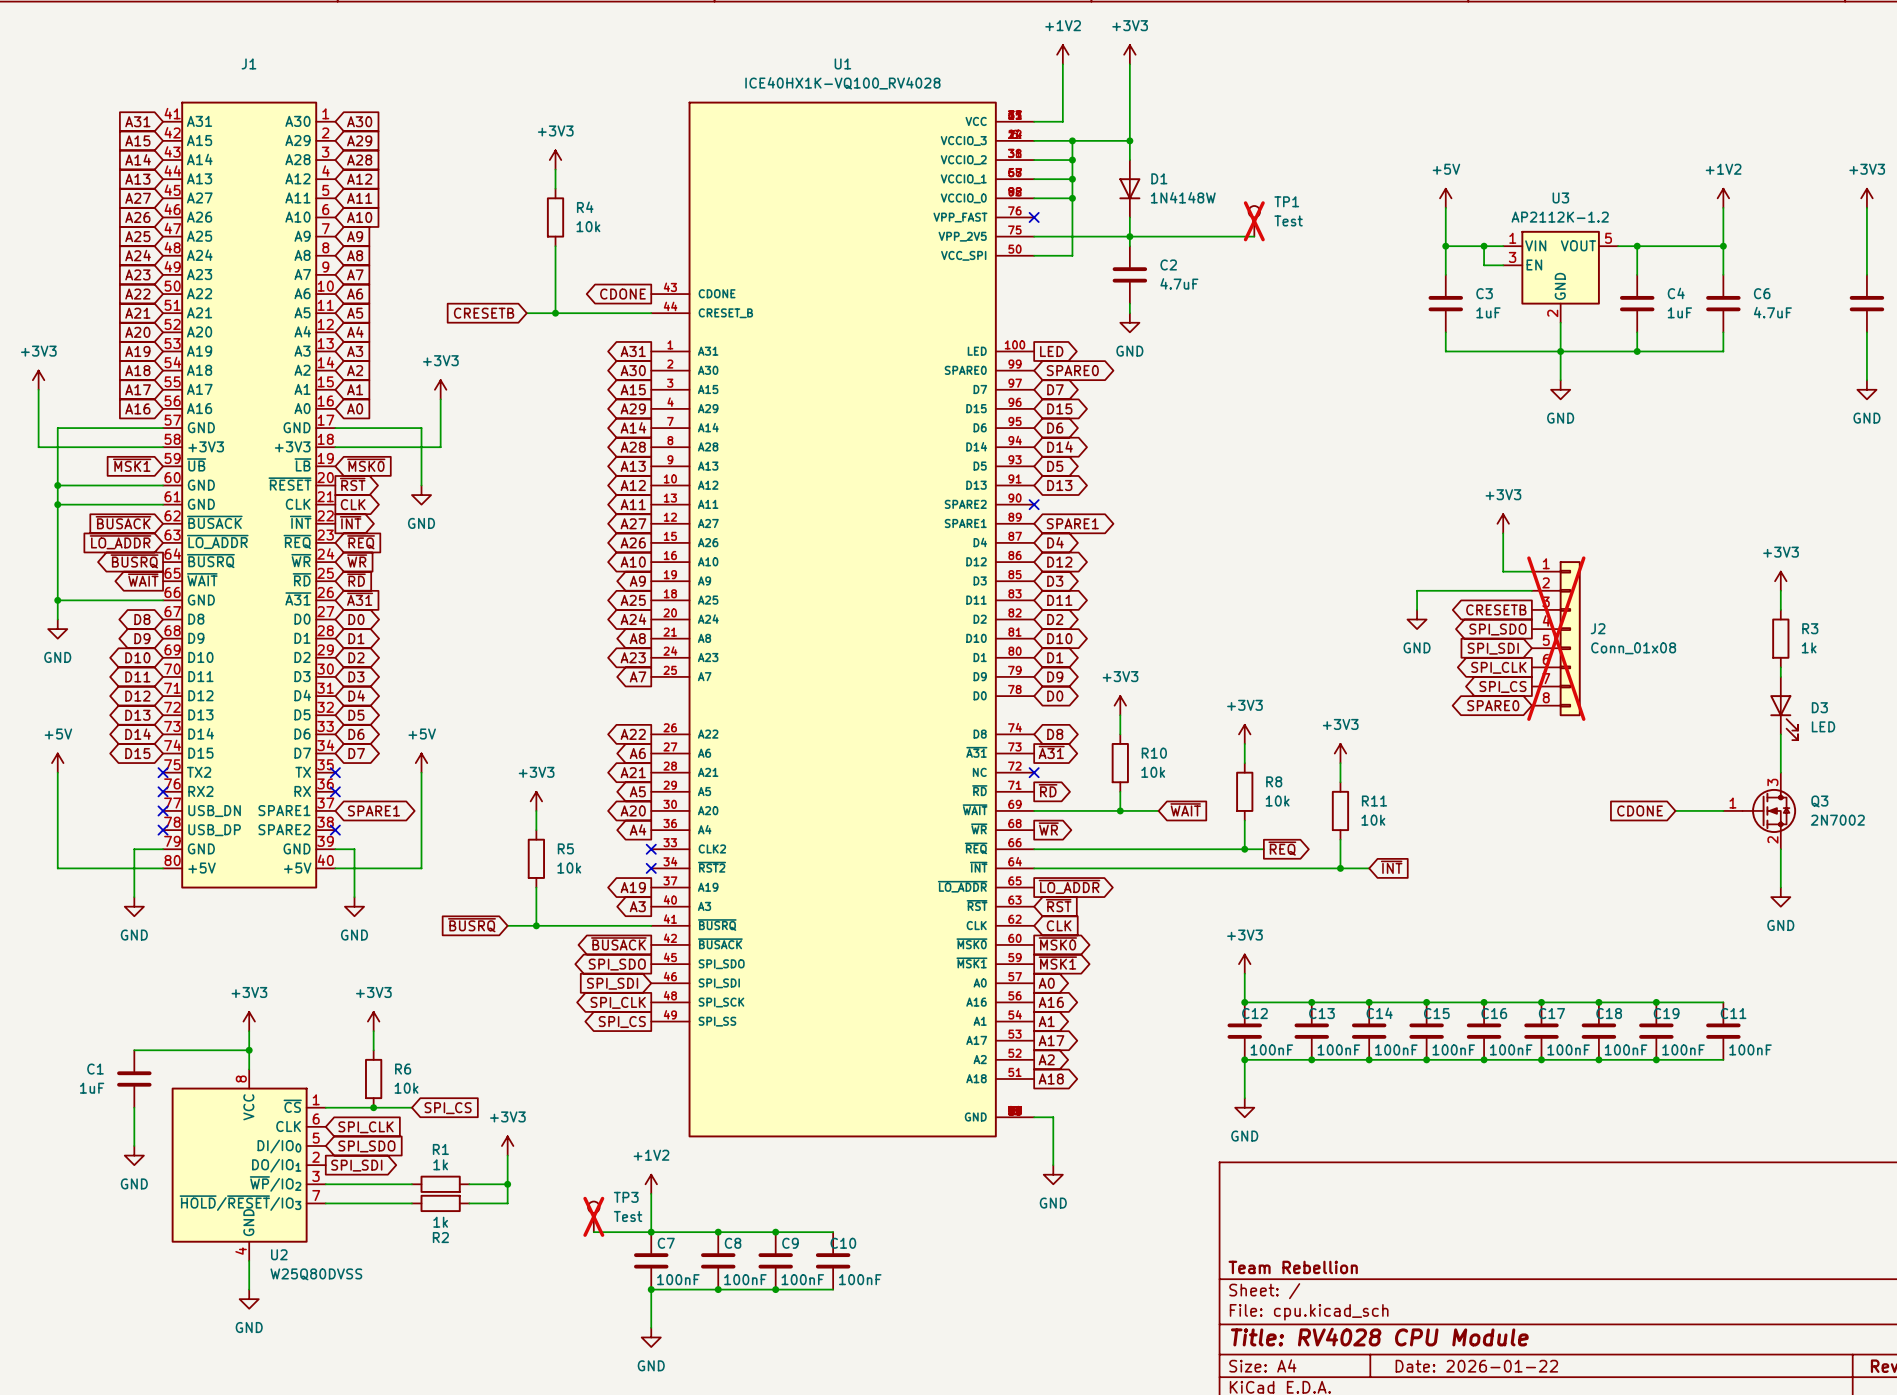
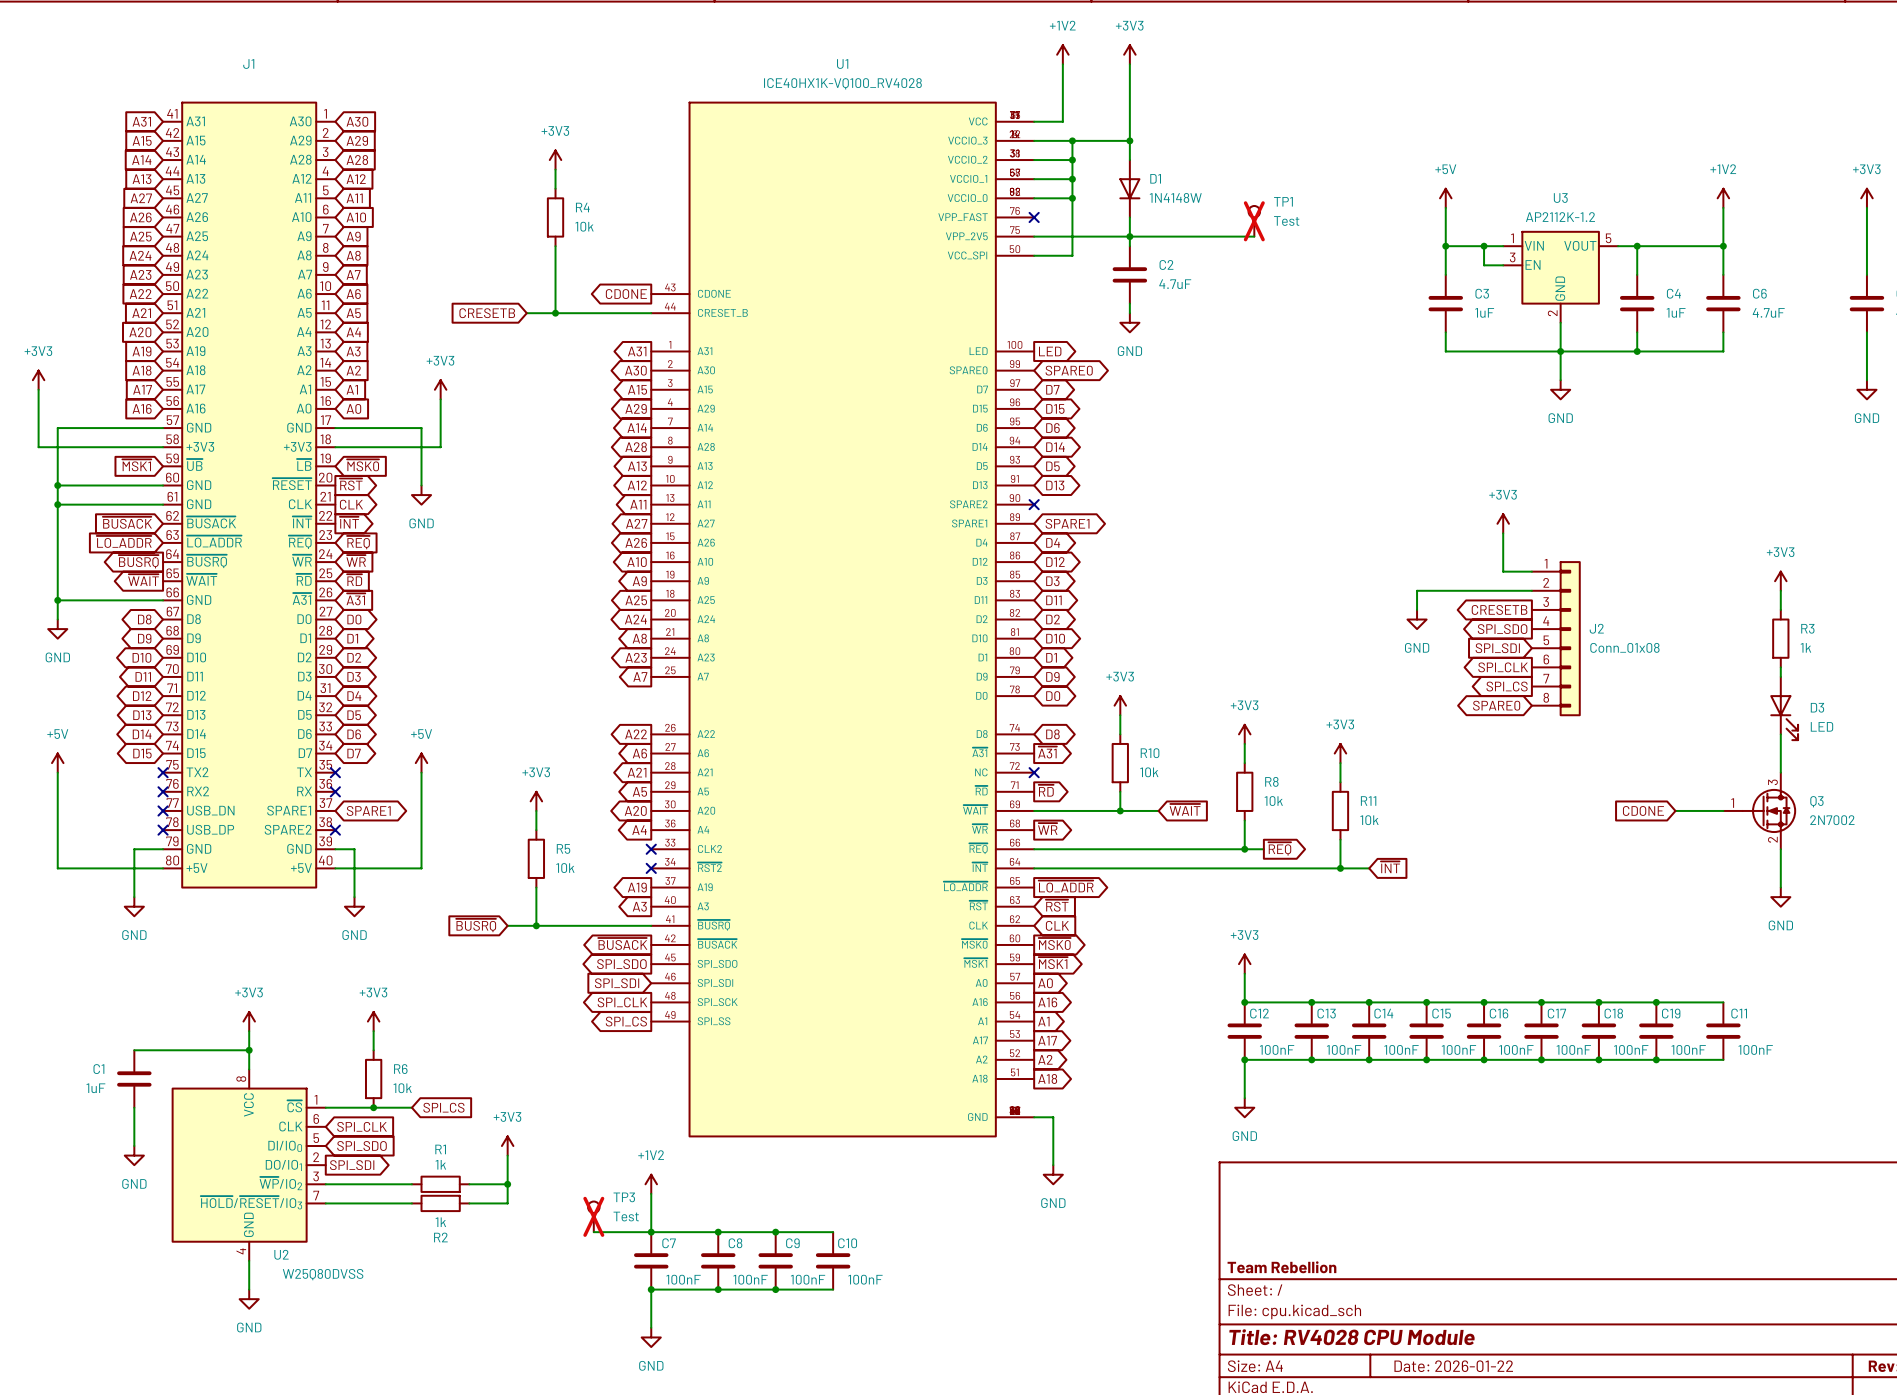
J2 do-not-place cross: (1556, 638) -> none

